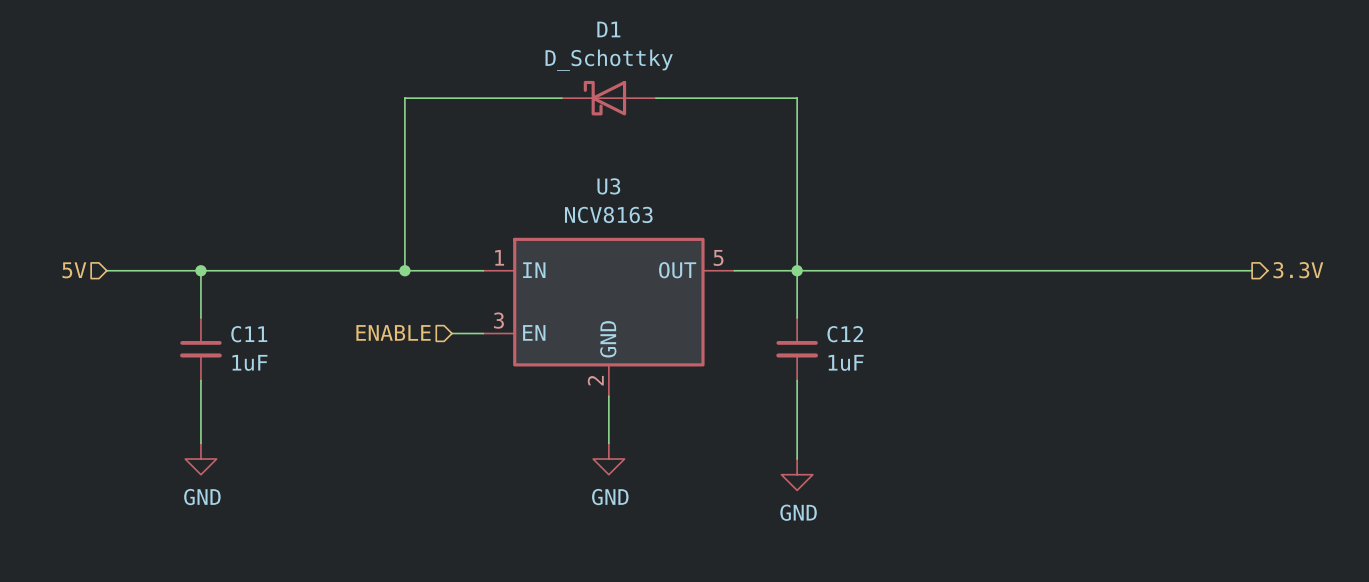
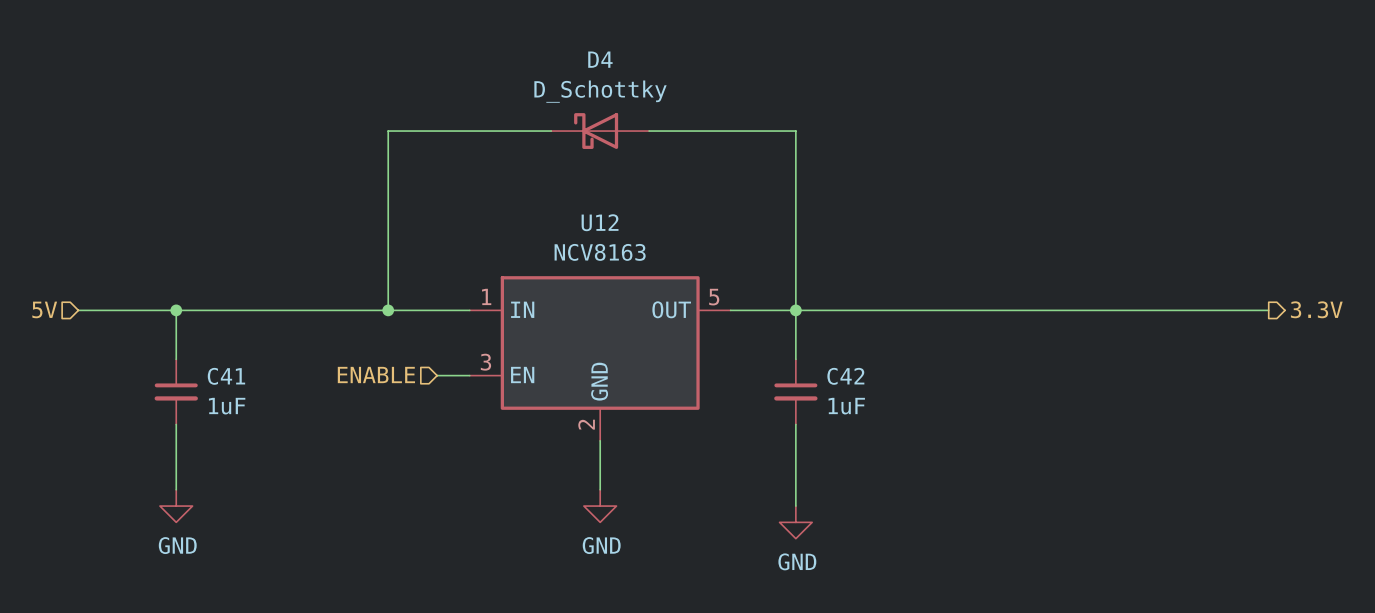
D1 name: D1 (608, 29) -> D4 (600, 59)
U3 name: U3 (608, 186) -> U12 (600, 222)
C11 name: C11 (249, 334) -> C41 (226, 376)
C12 name: C12 (845, 334) -> C42 (845, 376)

